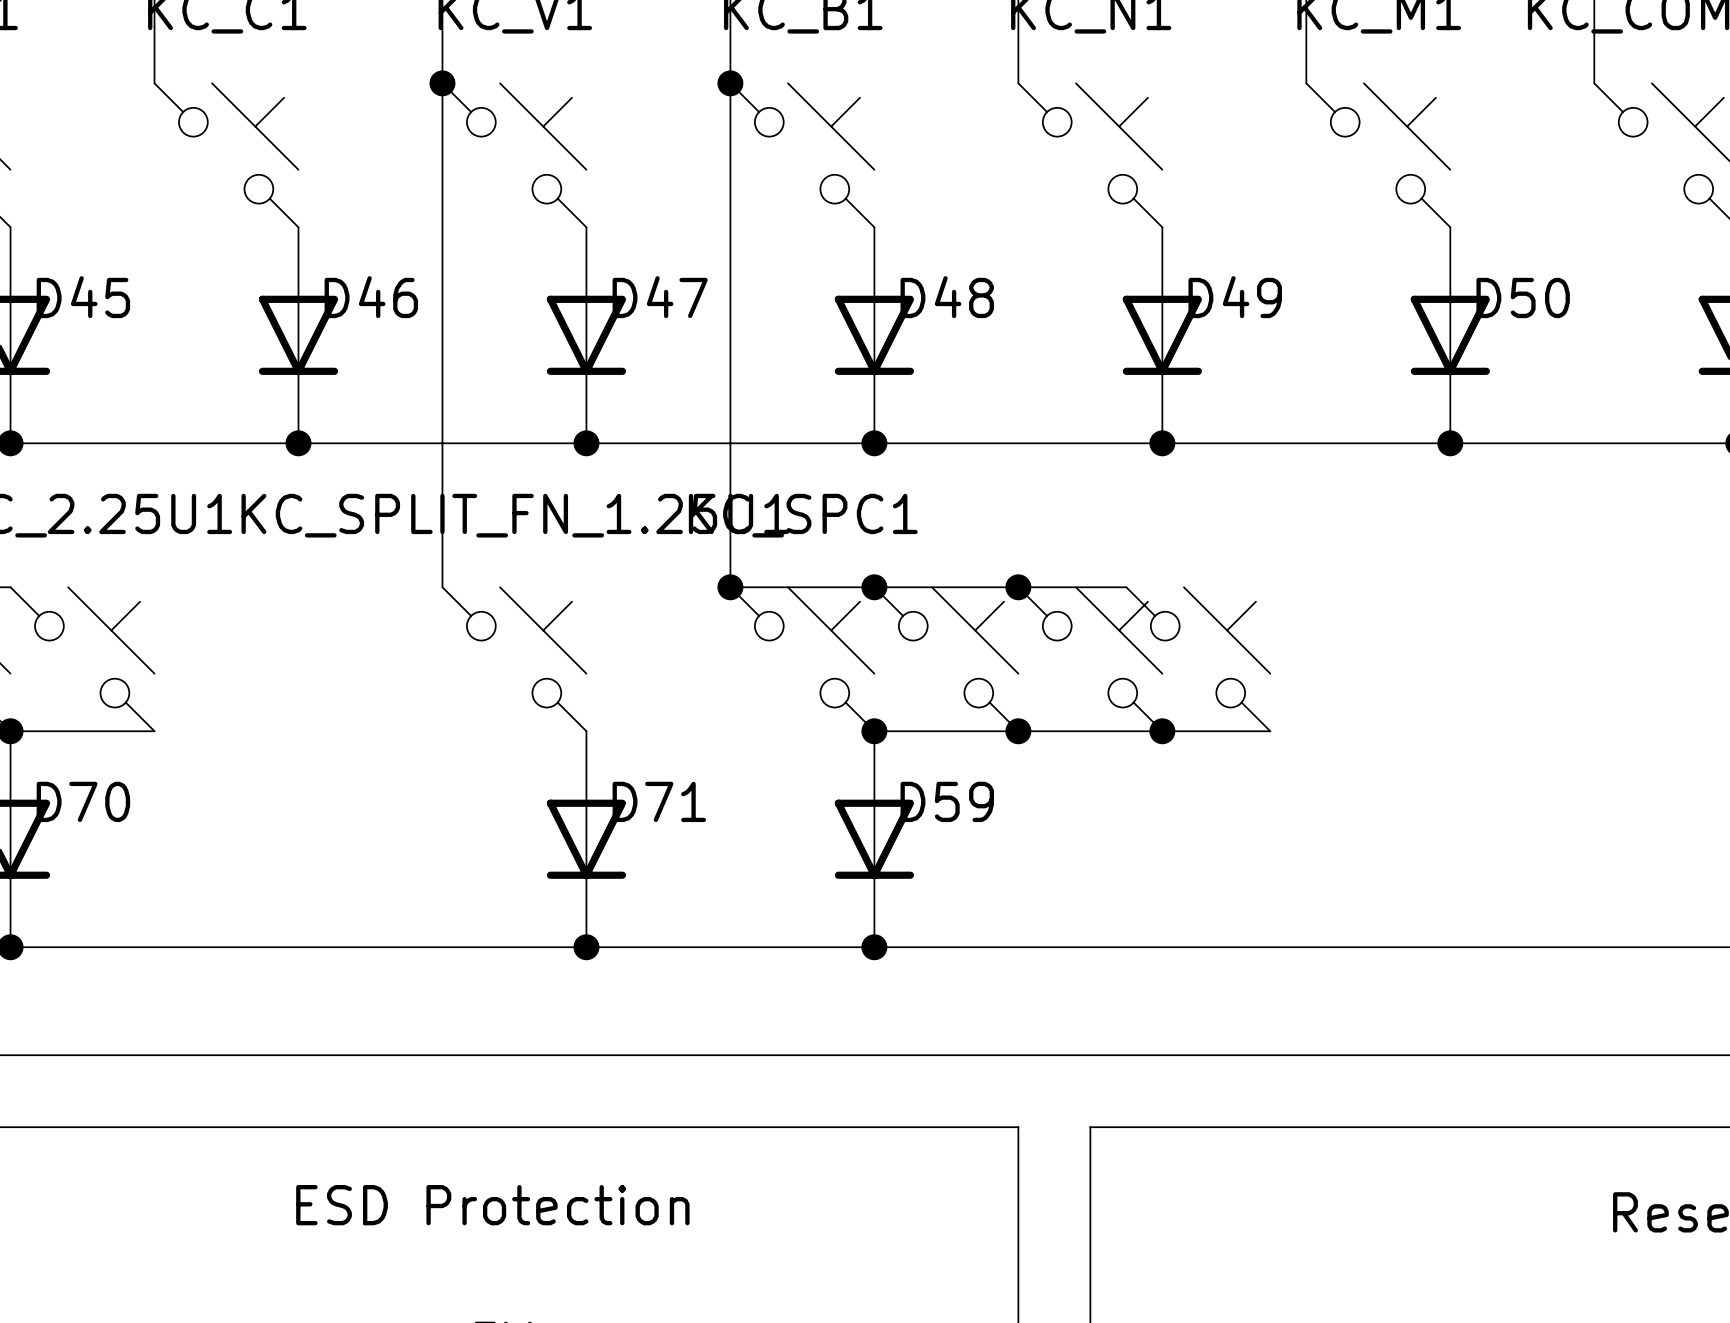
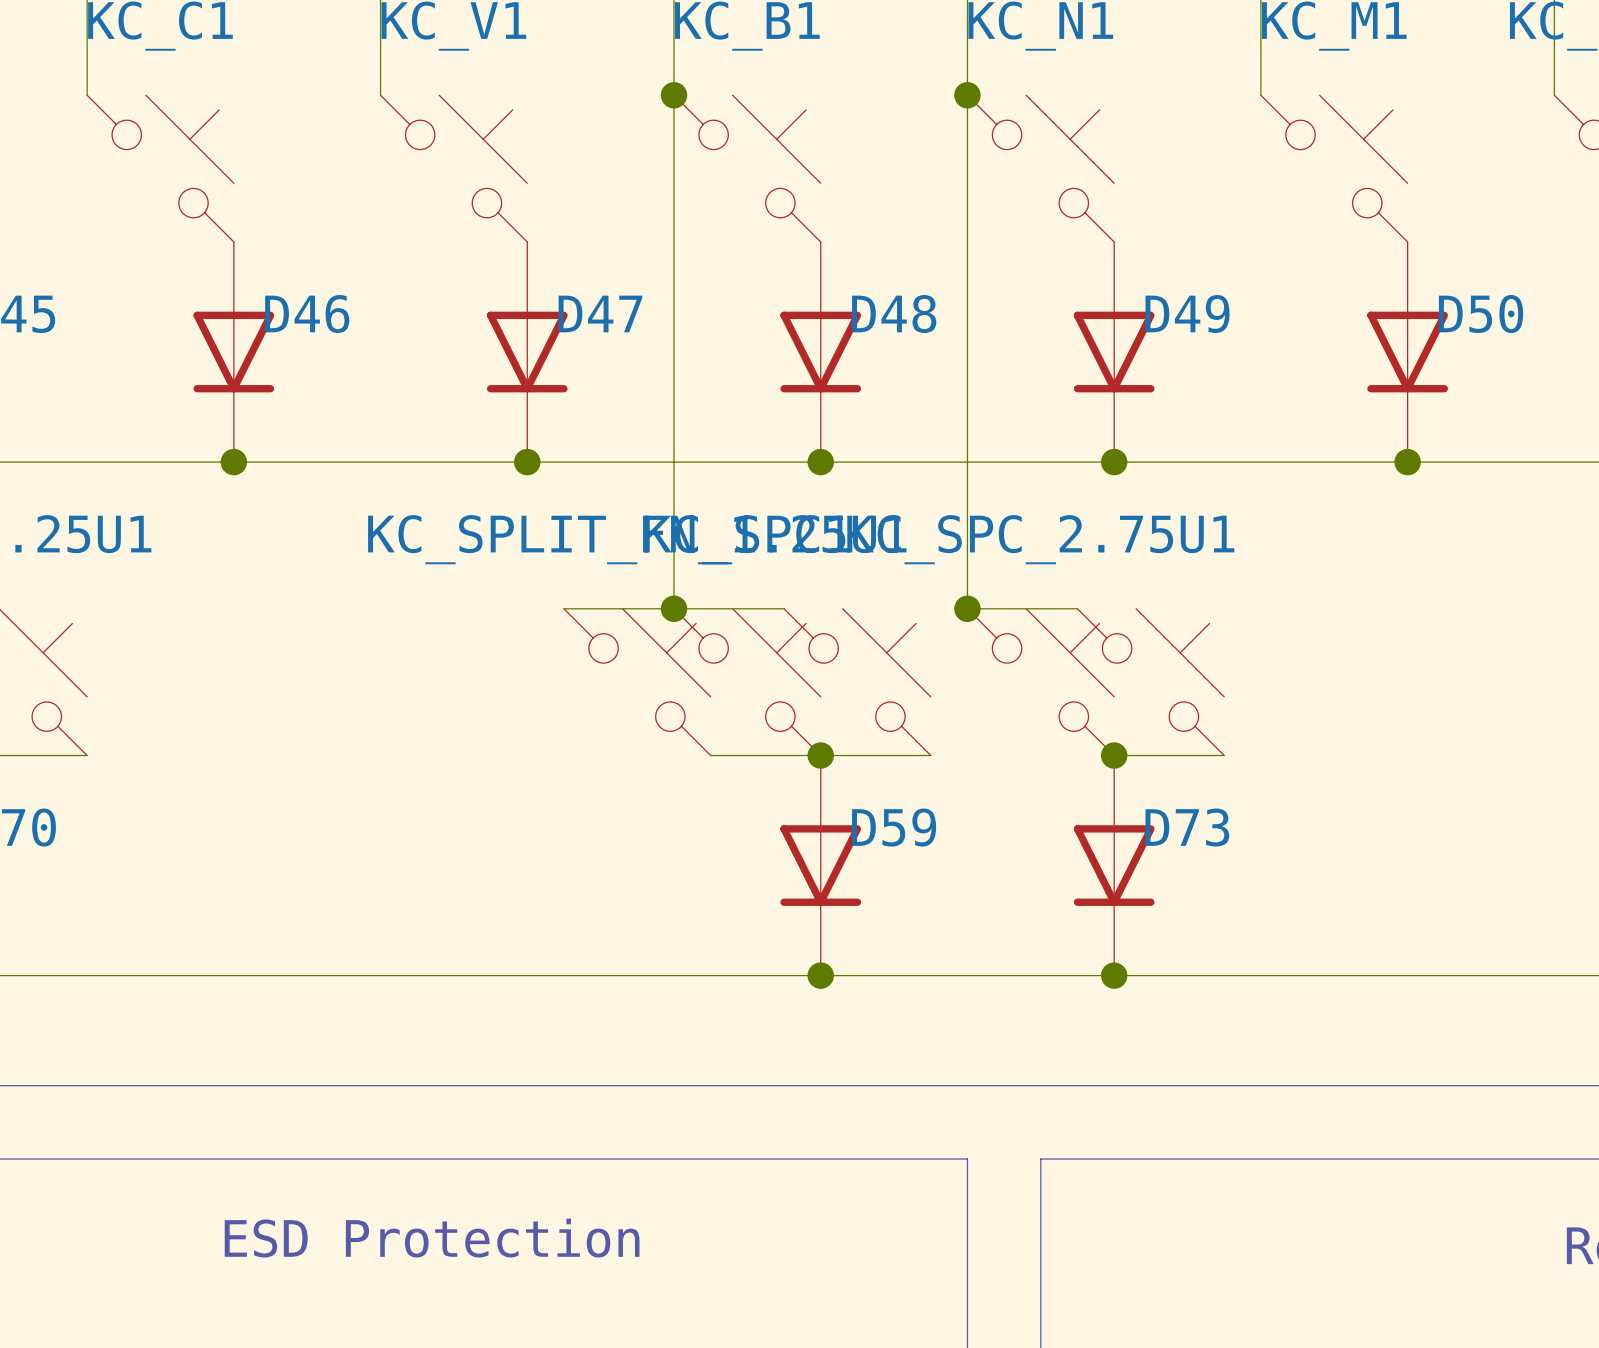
wire: (442, 83) (442, 587) -> none
junction: (442, 83) -> none
junction: none -> (967, 95)
KC_SPC_2.75U1 name: none -> KC_SPC_2.75U1 (1040, 539)
wire: none -> (563, 608) (674, 608)
wire: (838, 587) (1018, 587) -> (967, 95) (967, 608)
junction: (874, 587) -> none
KC_SPLIT_FN_1.25U1 position: (514, 659) -> (637, 682)
part position: (946, 659) -> (857, 682)
wire: none -> (710, 755) (820, 755)
wire: (982, 731) (1162, 731) -> none
junction: (1018, 731) -> none
D71: (586, 839) -> none
D73: none -> (1114, 865)
junction: (586, 947) -> none
junction: none -> (1114, 975)

